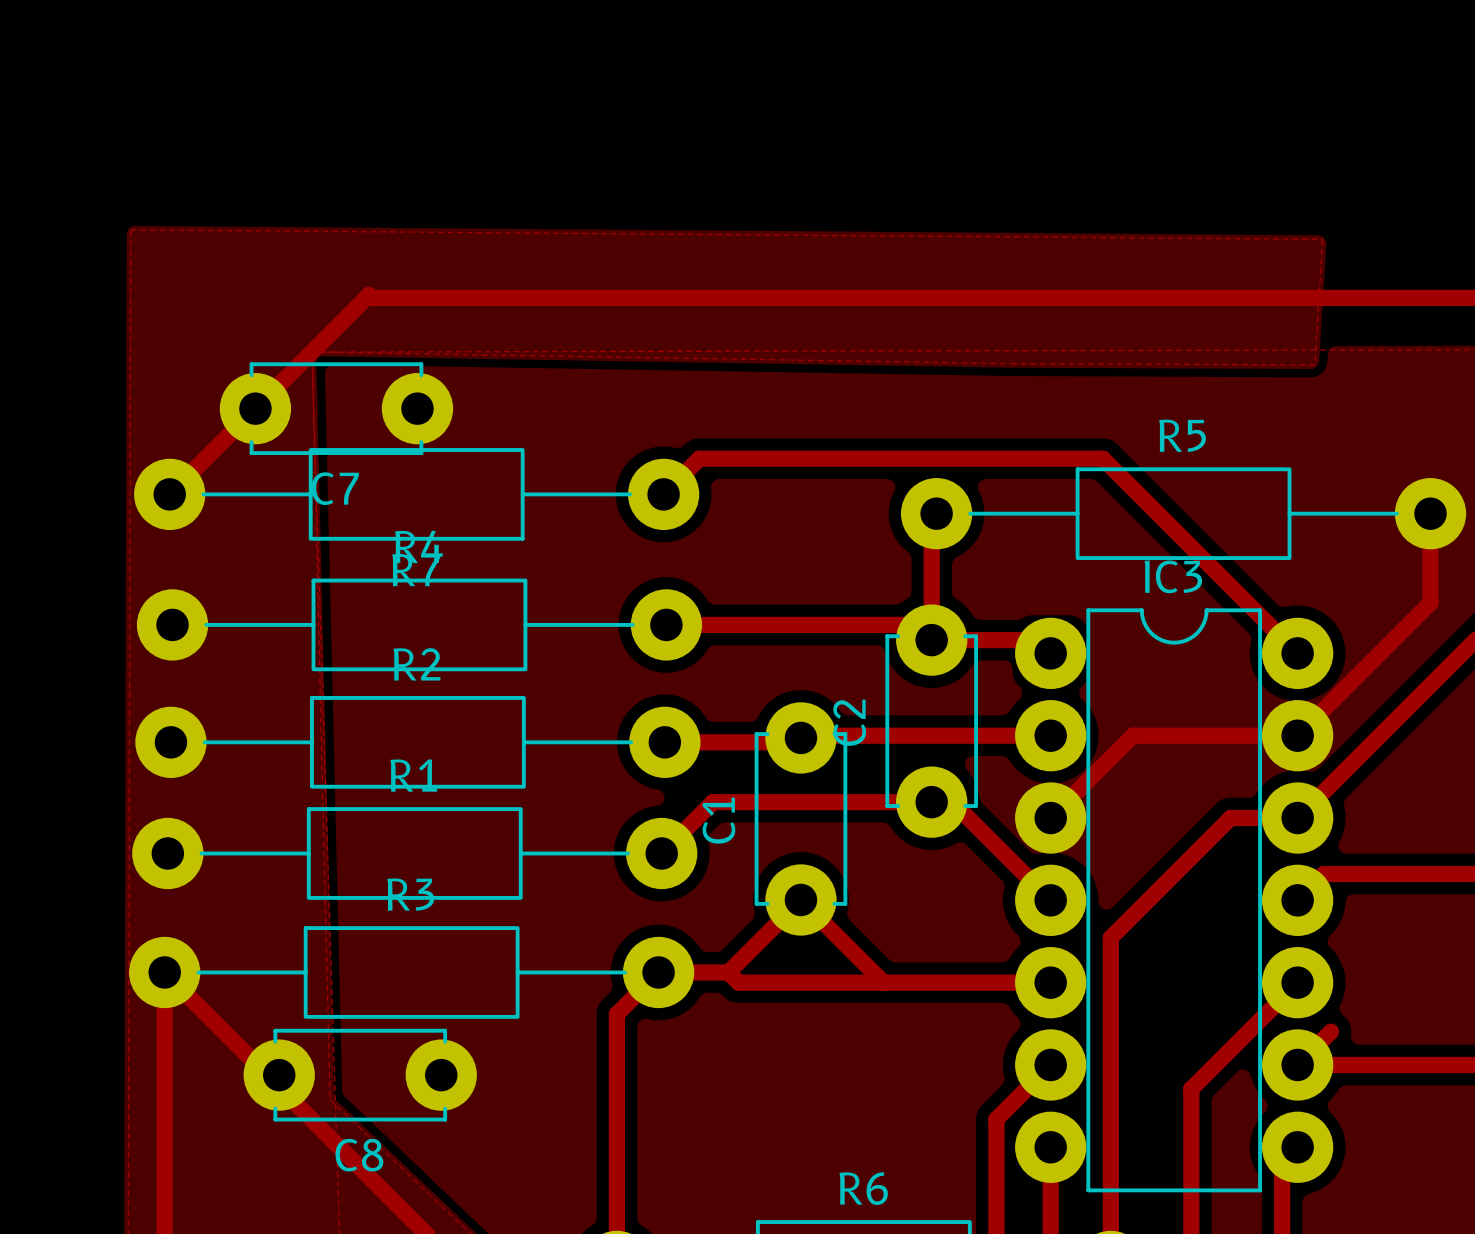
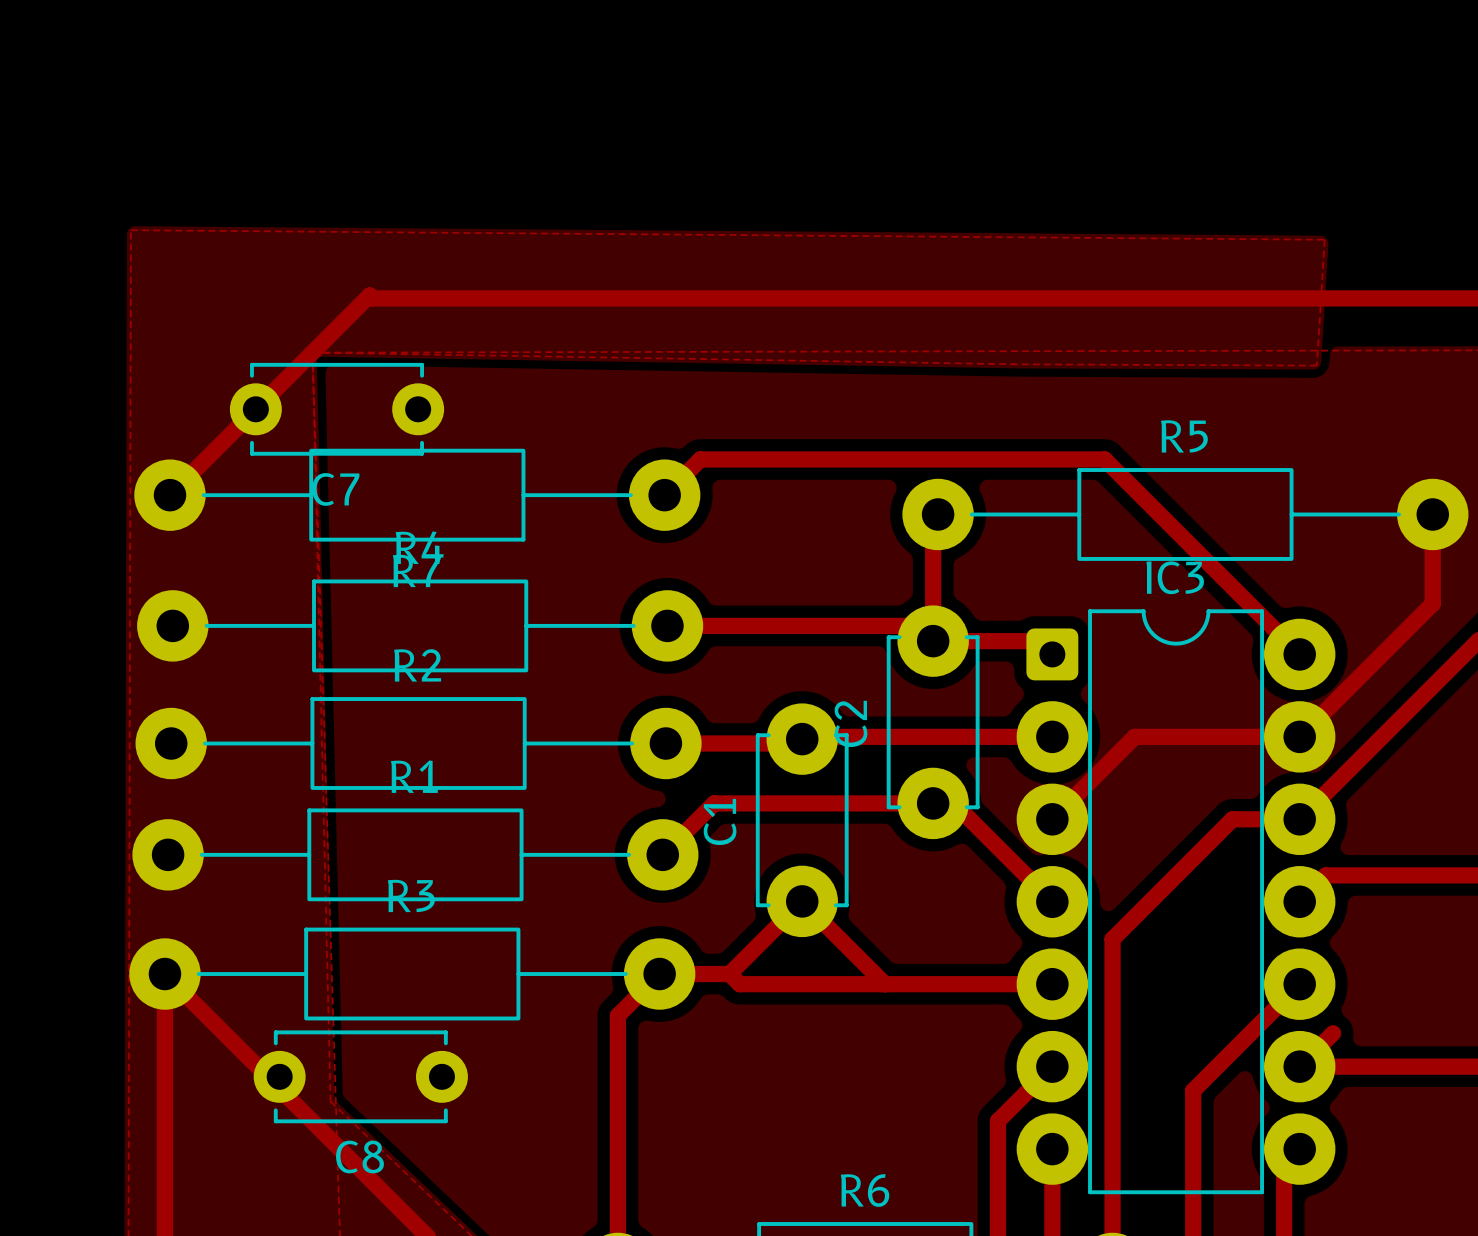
C7 footprint: [219, 362, 454, 455] -> [229, 362, 445, 456]
IC3 footprint: [1015, 608, 1334, 1193] -> [1016, 609, 1336, 1195]
C8 footprint: [243, 1028, 477, 1122] -> [253, 1030, 468, 1124]

